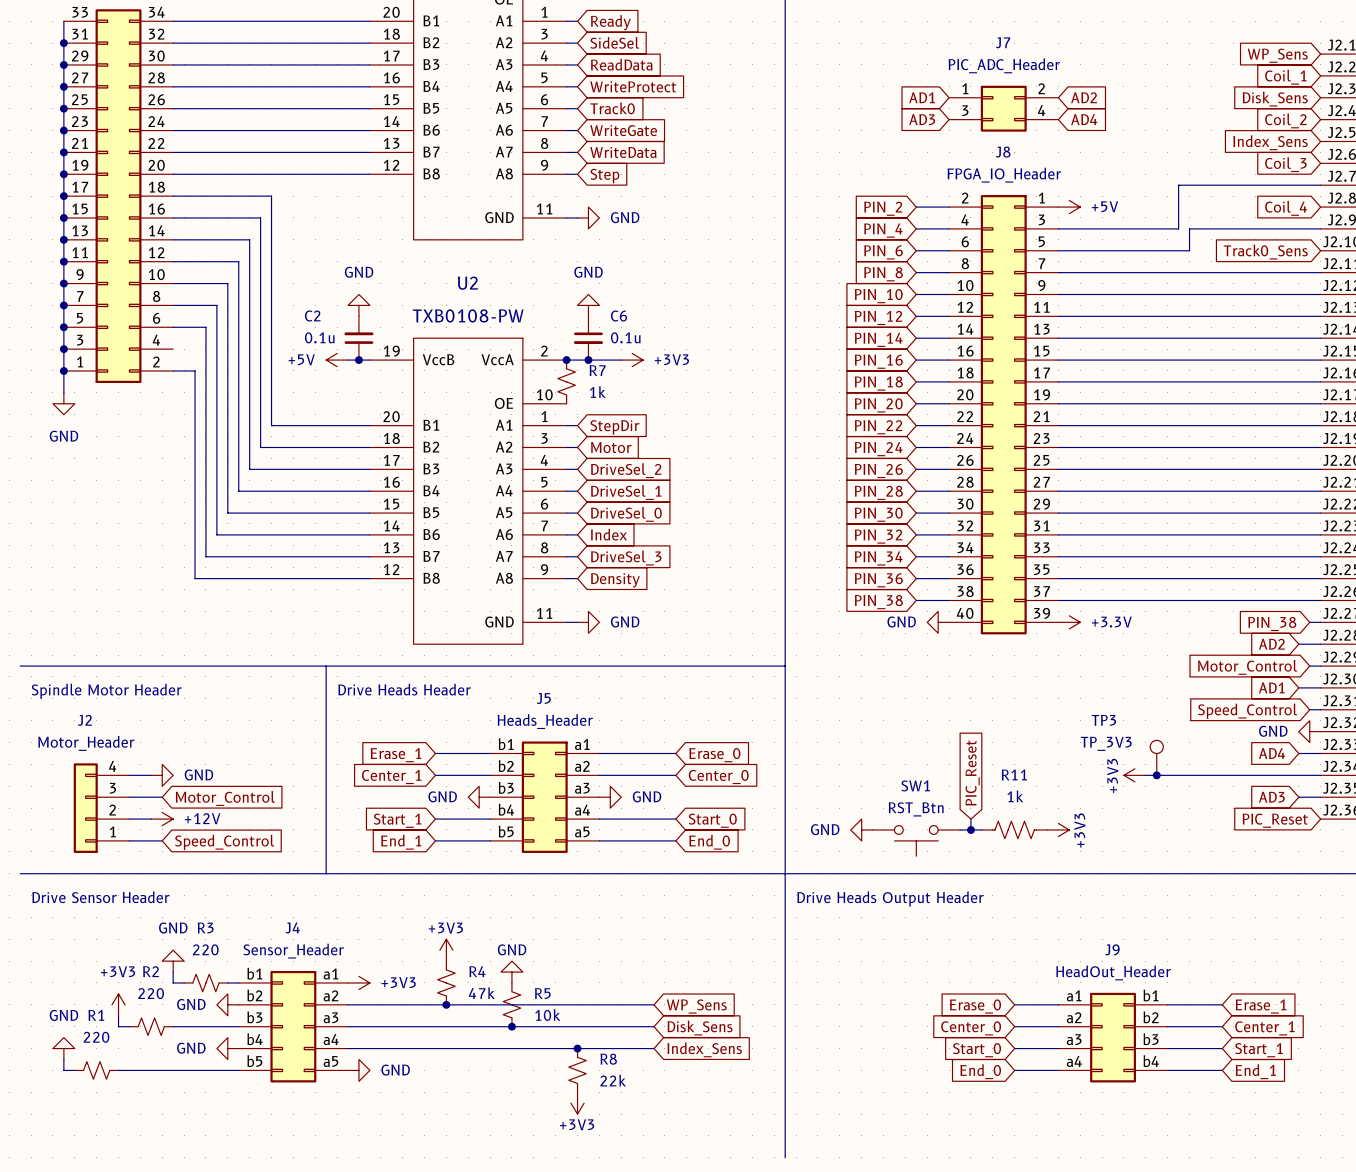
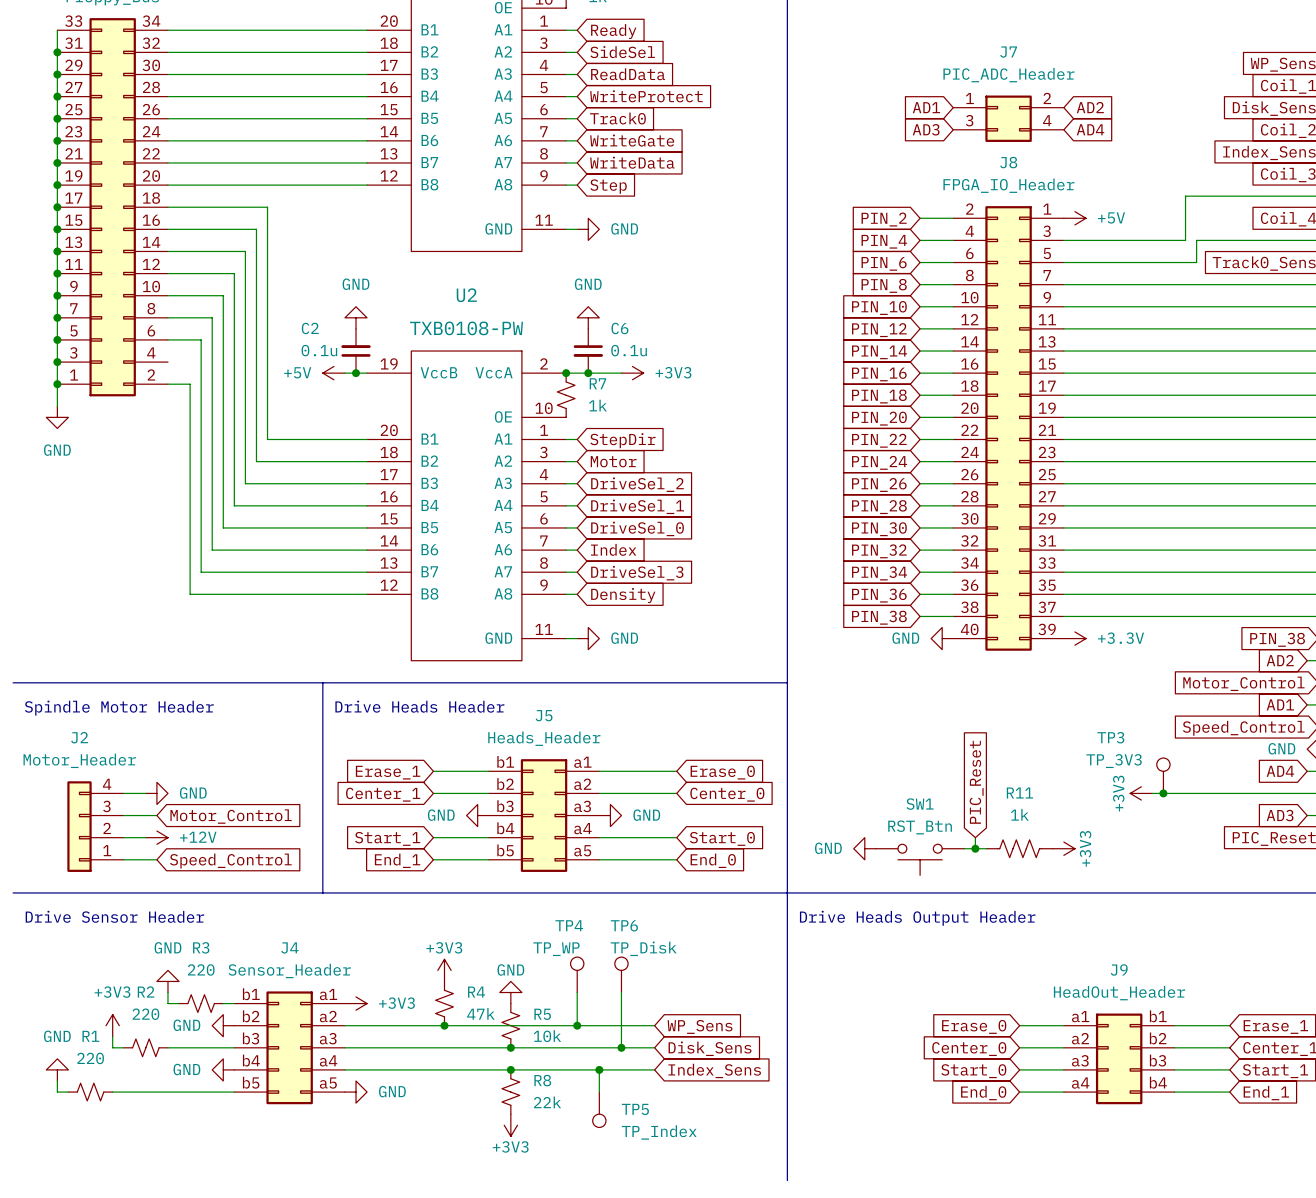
TP4: none -> TP_WP (577, 974)
TP6: none -> TP_Disk (621, 974)
wire: none -> (577, 992) (577, 1025)
wire: none -> (621, 992) (621, 1047)
junction: none -> (577, 1025)
junction: none -> (621, 1047)
junction: none -> (510, 1069)
junction: (577, 1048) -> none
wire: none -> (599, 1069) (599, 1092)
junction: none -> (599, 1069)
R8 position: (577, 1070) -> (510, 1092)
TP5: none -> TP_Index (599, 1109)
power symbol position: +3V3 (577, 1103) -> +3V3 (510, 1125)

